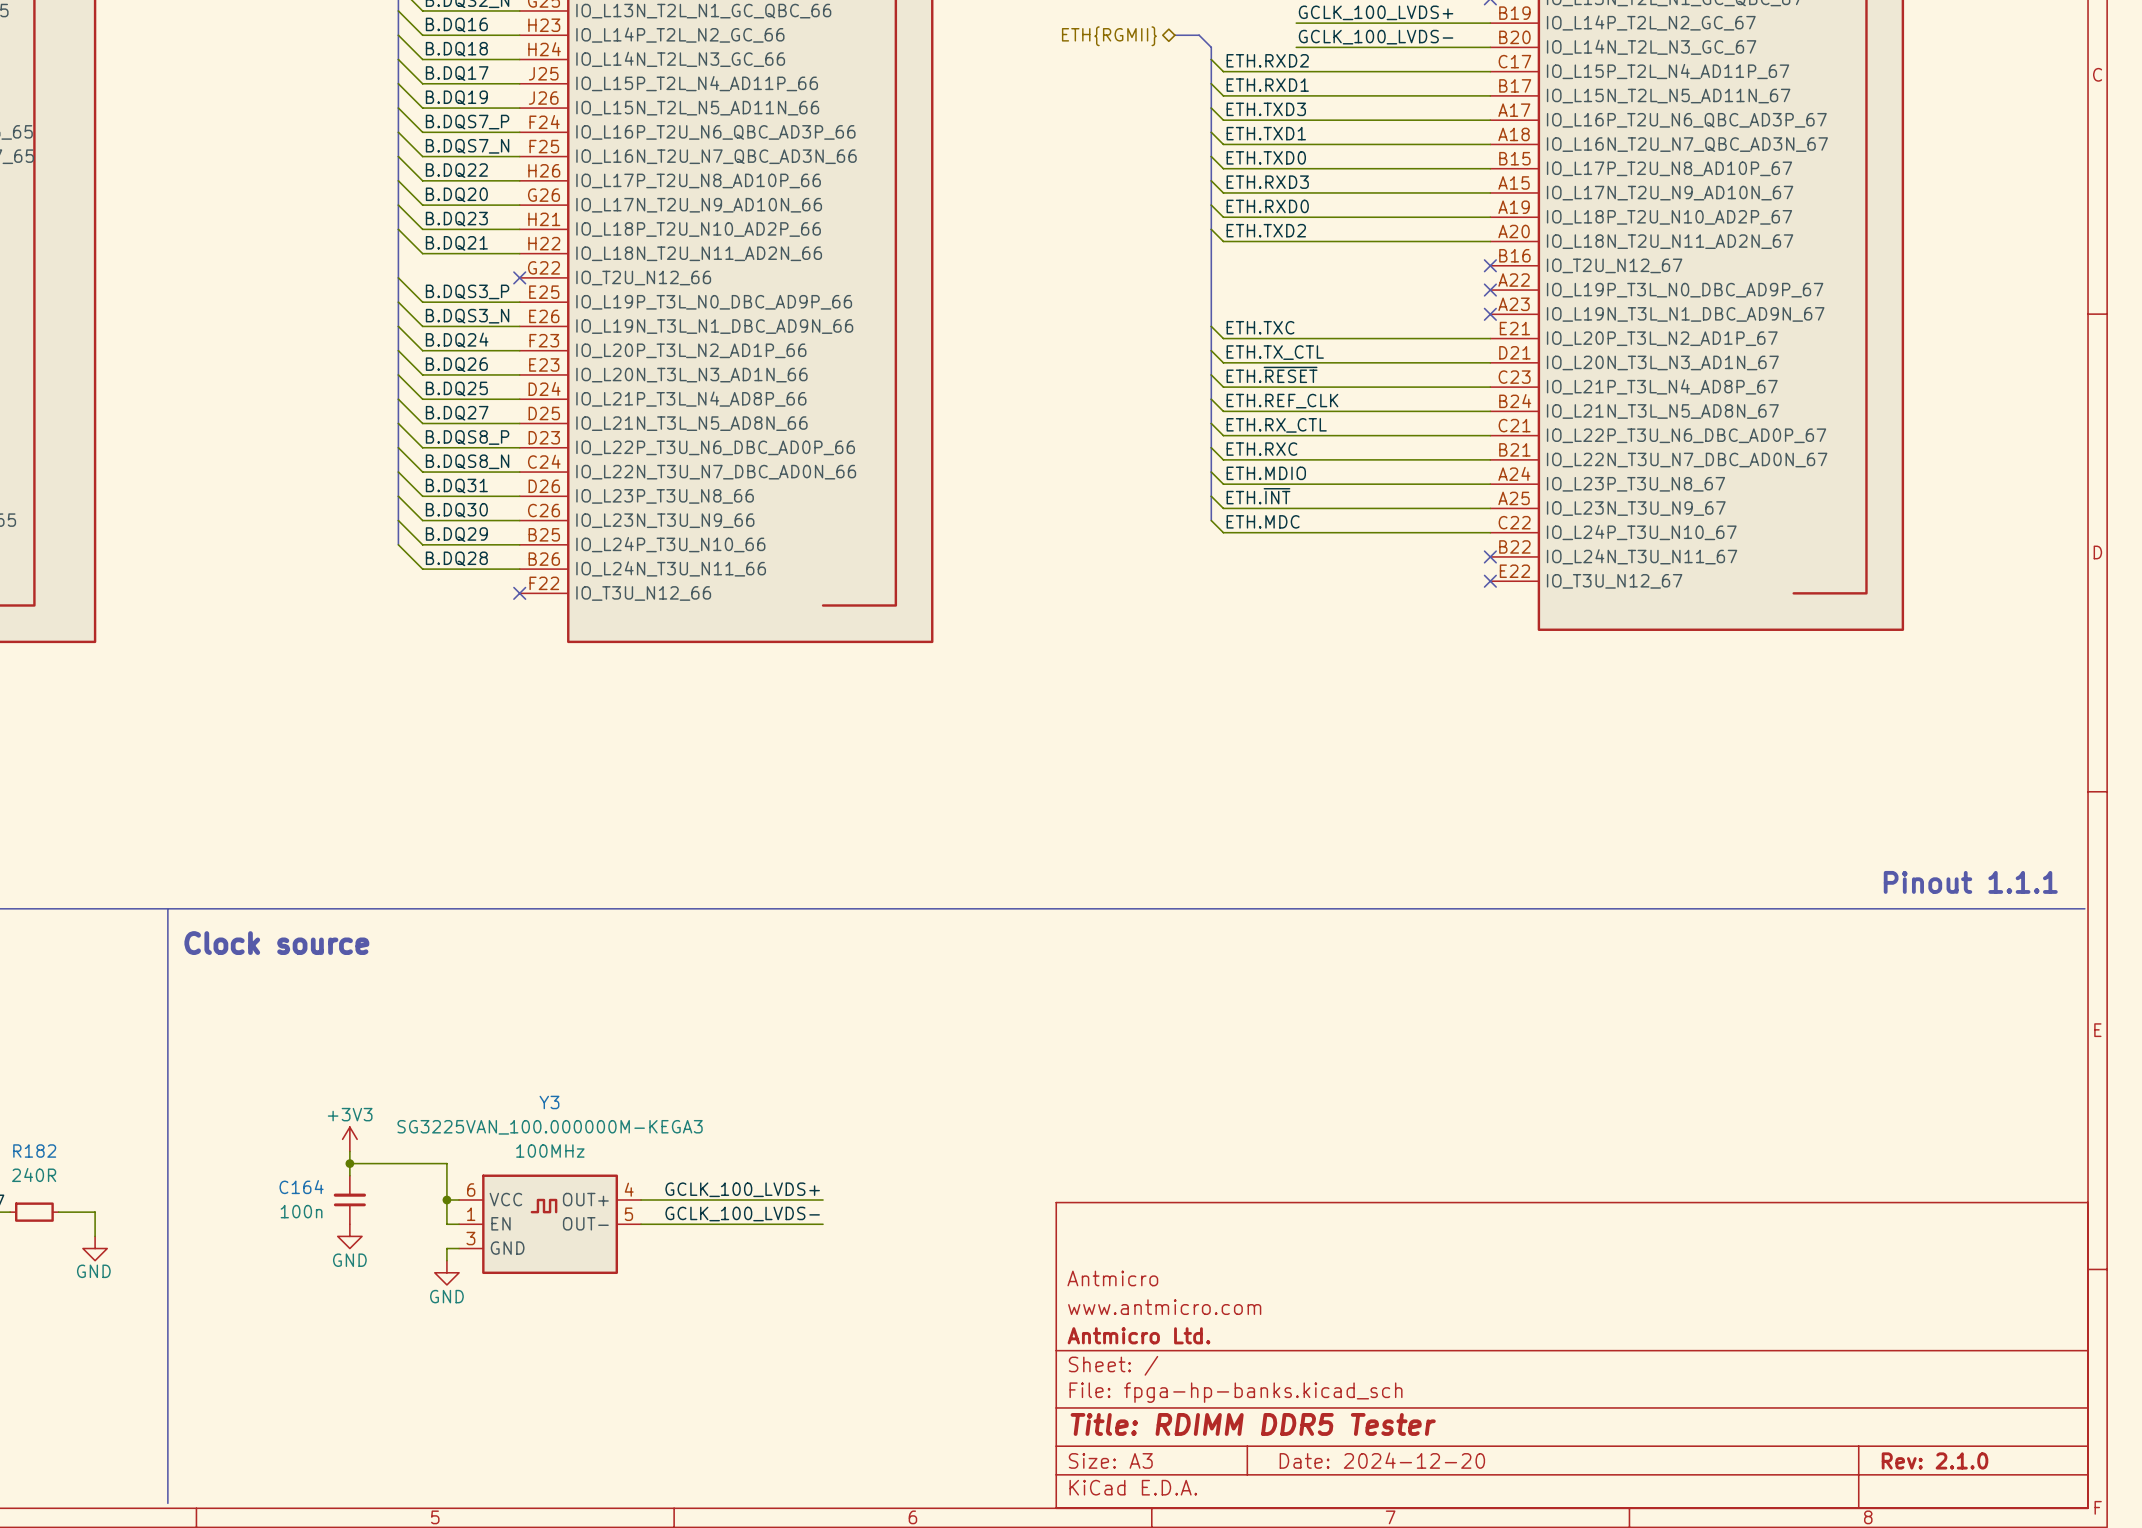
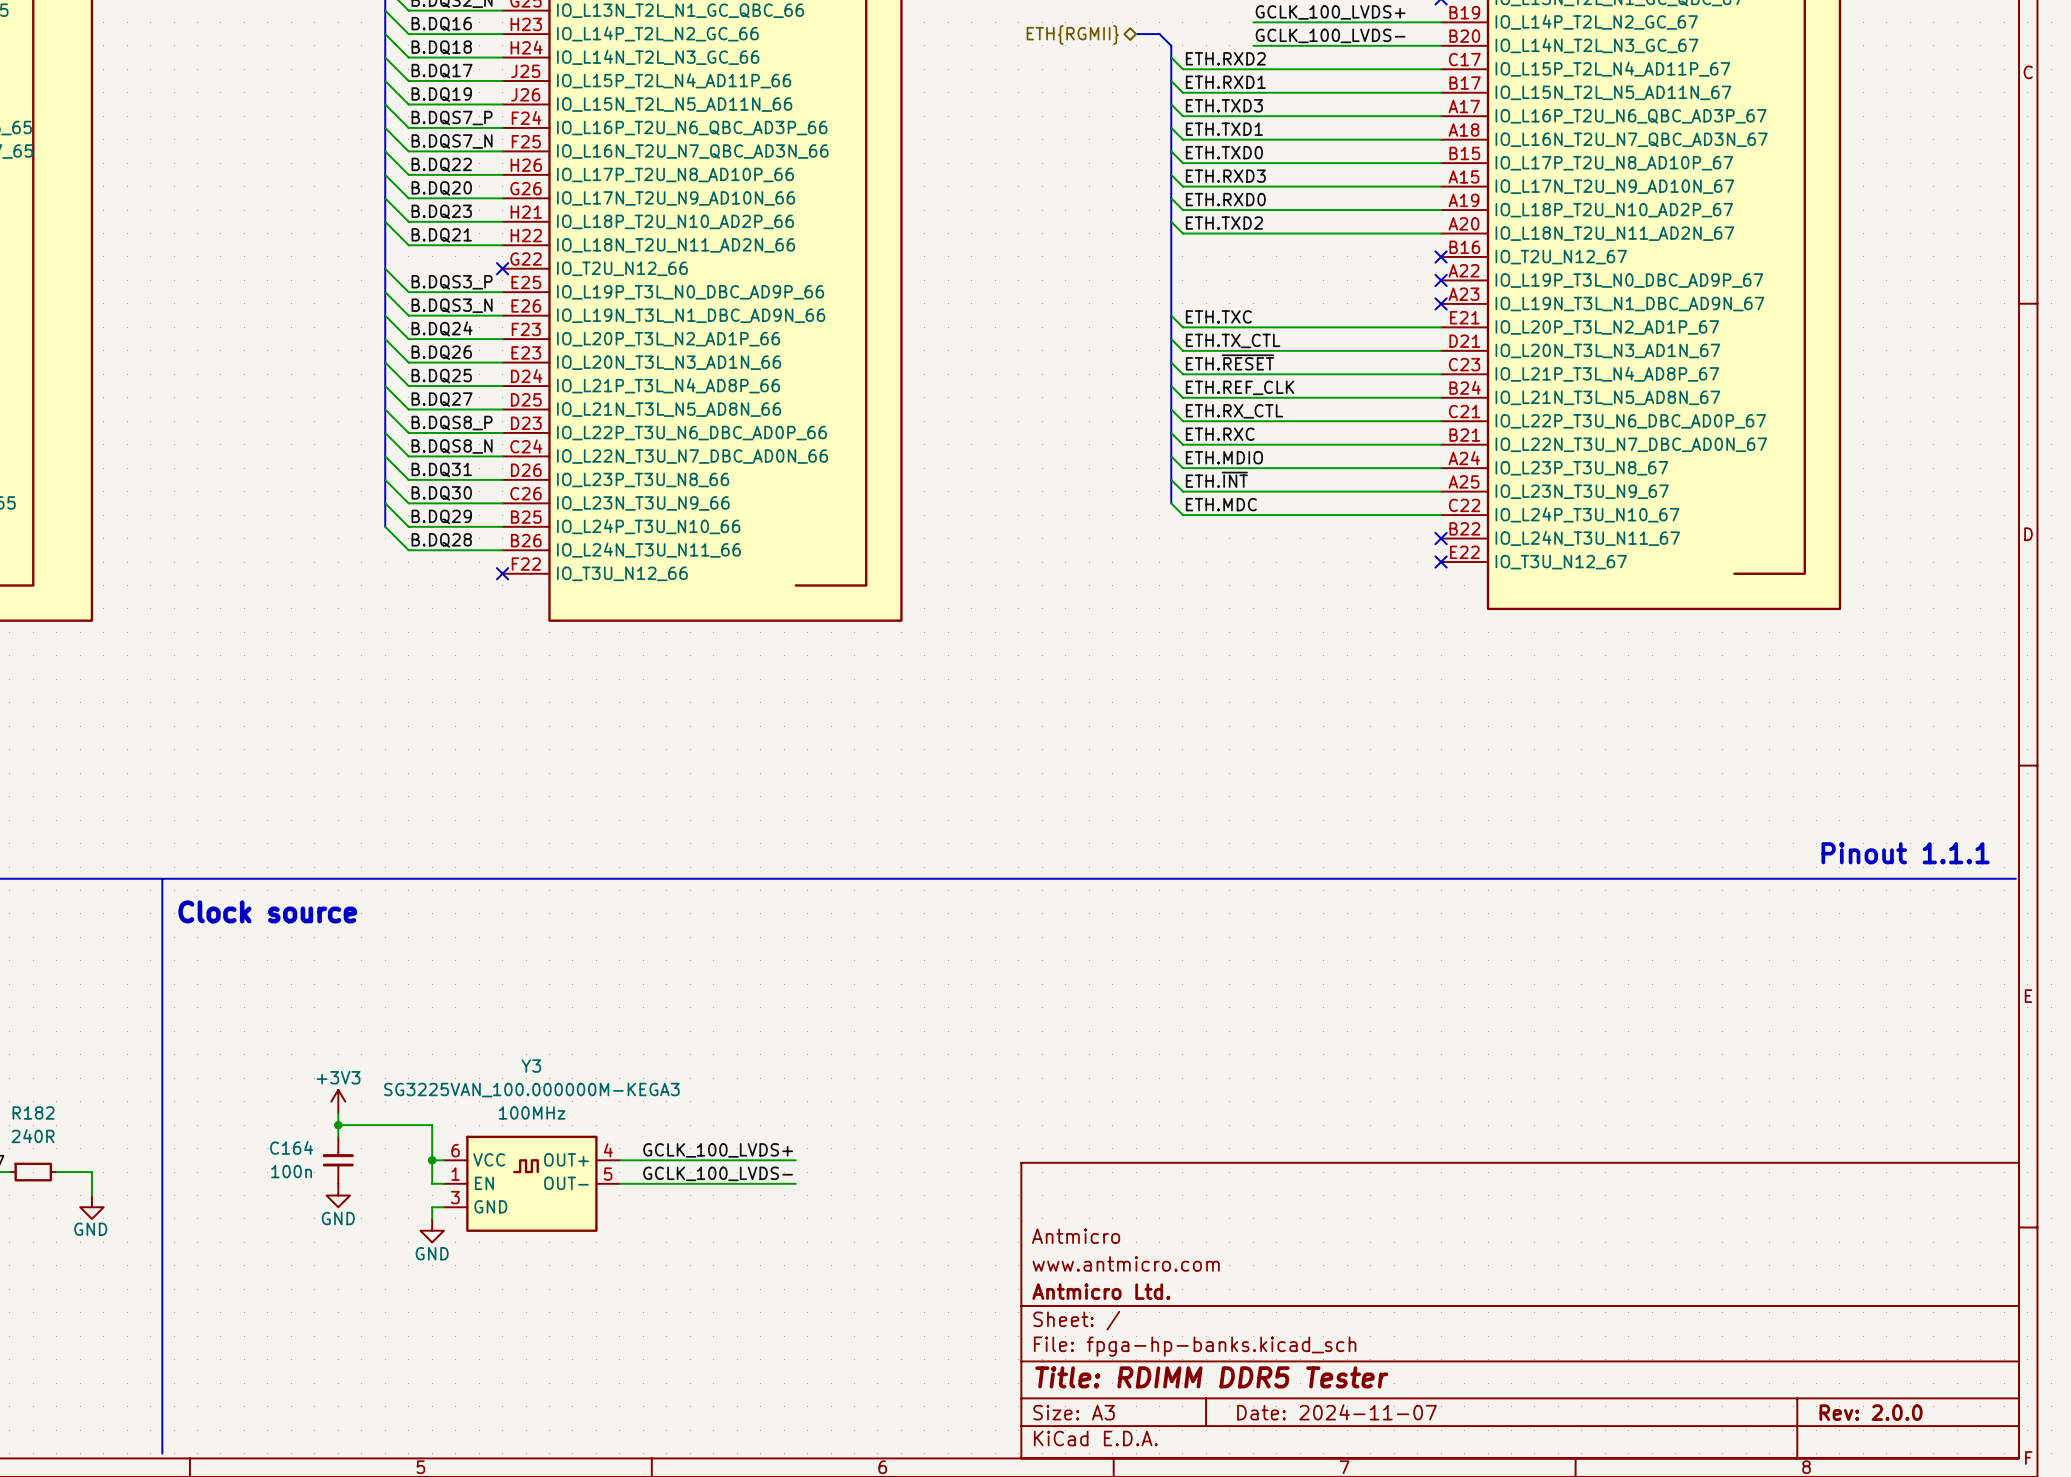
title block: Date: 2024-12-20 (1382, 1460) -> Date: 2024-11-07 (1336, 1412)
title block: Rev: 2.1.0 (1935, 1460) -> Rev: 2.0.0 (1871, 1412)

